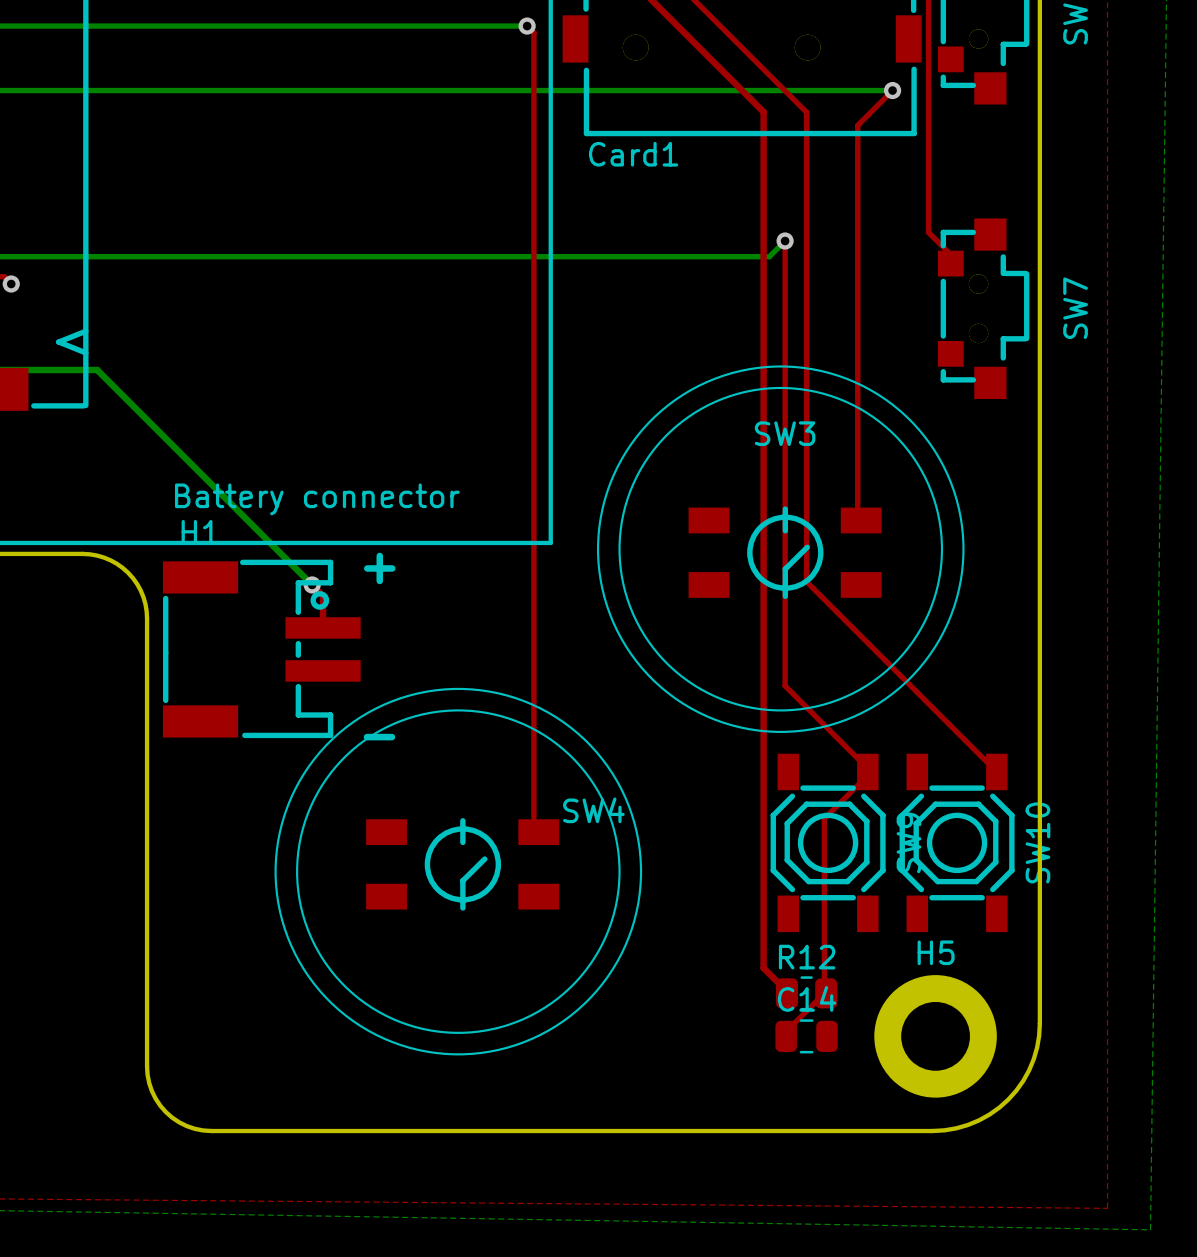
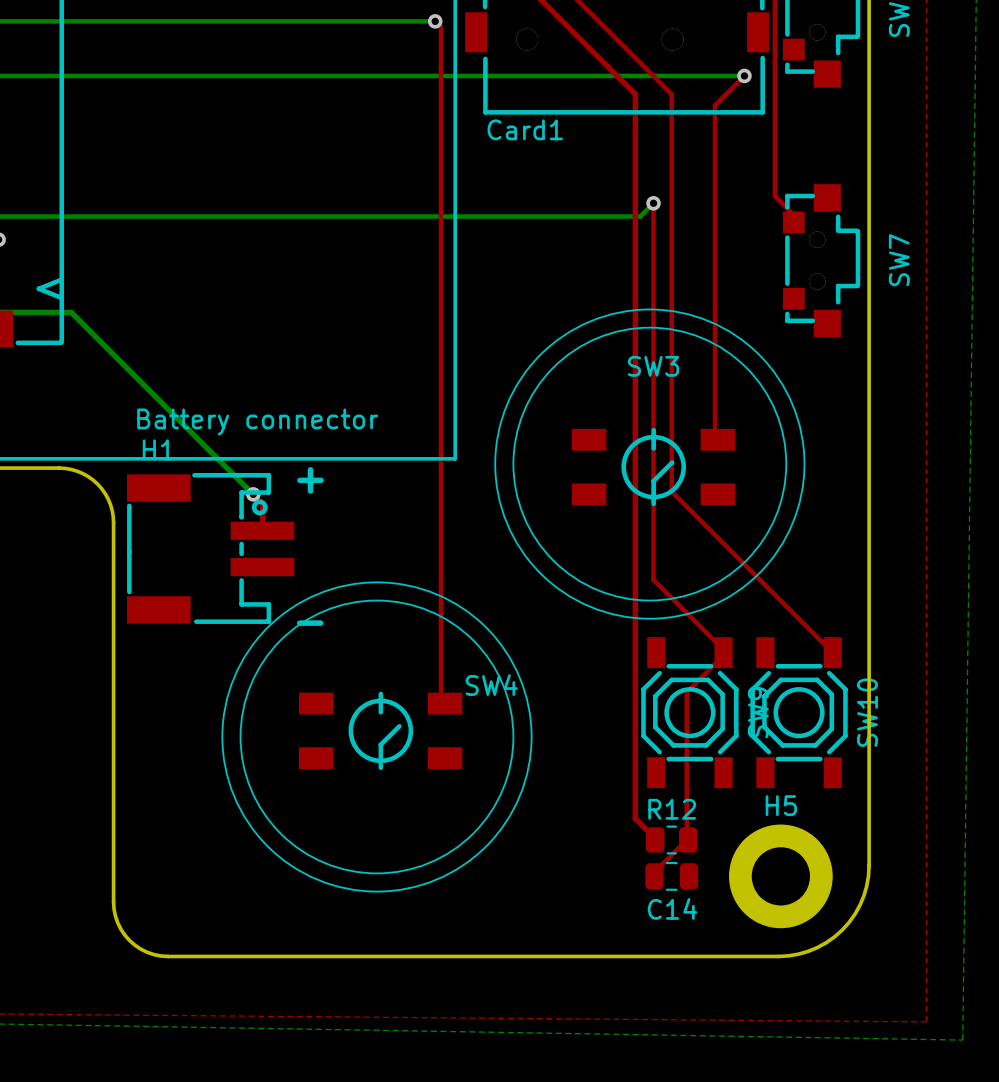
C14 name position: C14 (807, 998) -> C14 (672, 908)

